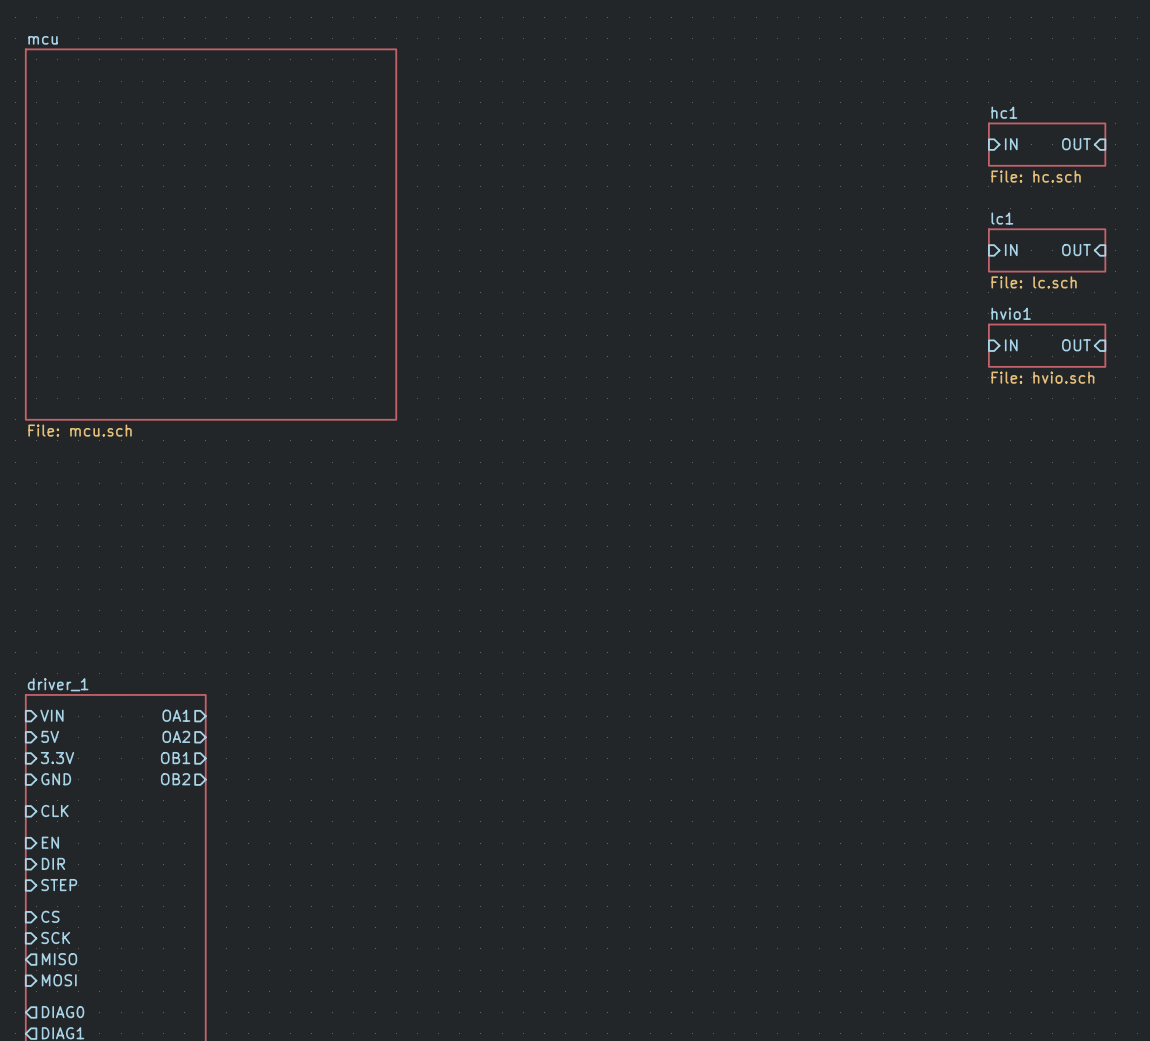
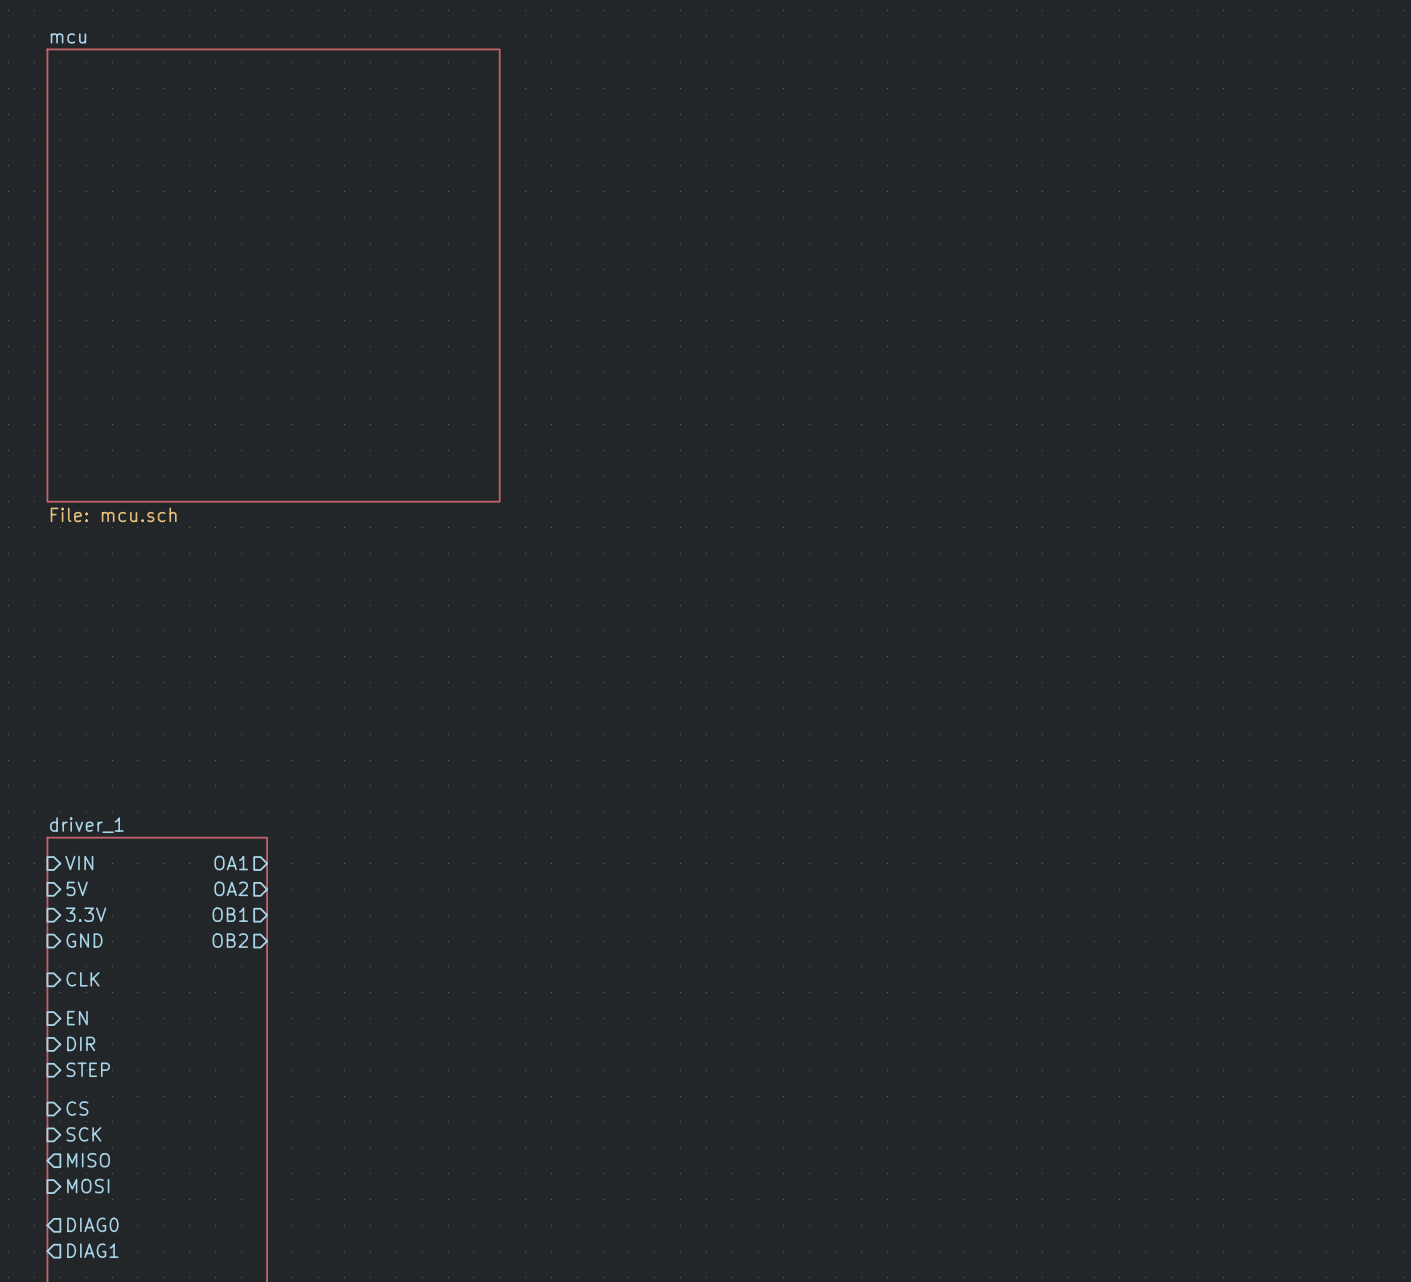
sheet pin: IN (1011, 144) -> none
sheet hc1: File: hc.sch (1047, 144) -> none
sheet pin: OUT (1076, 144) -> none
sheet pin: IN (1011, 250) -> none
sheet lc1: File: lc.sch (1047, 250) -> none
sheet pin: OUT (1076, 250) -> none
sheet pin: IN (1011, 345) -> none
sheet hvio1: File: hvio.sch (1047, 345) -> none
sheet pin: OUT (1076, 345) -> none

